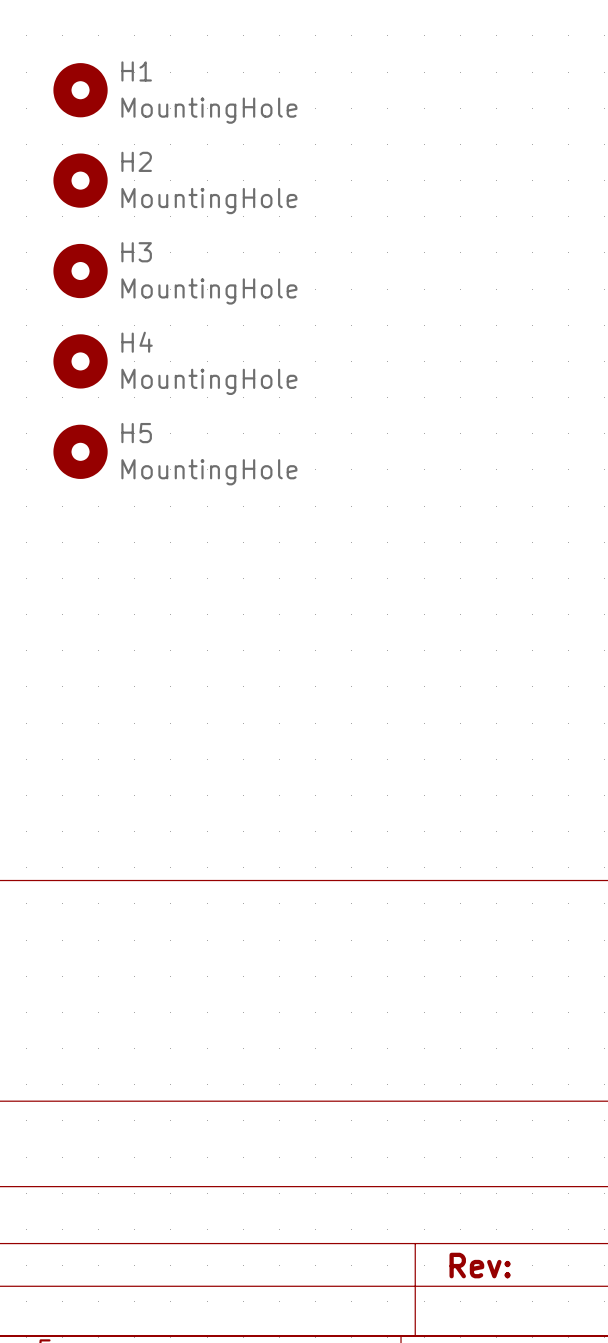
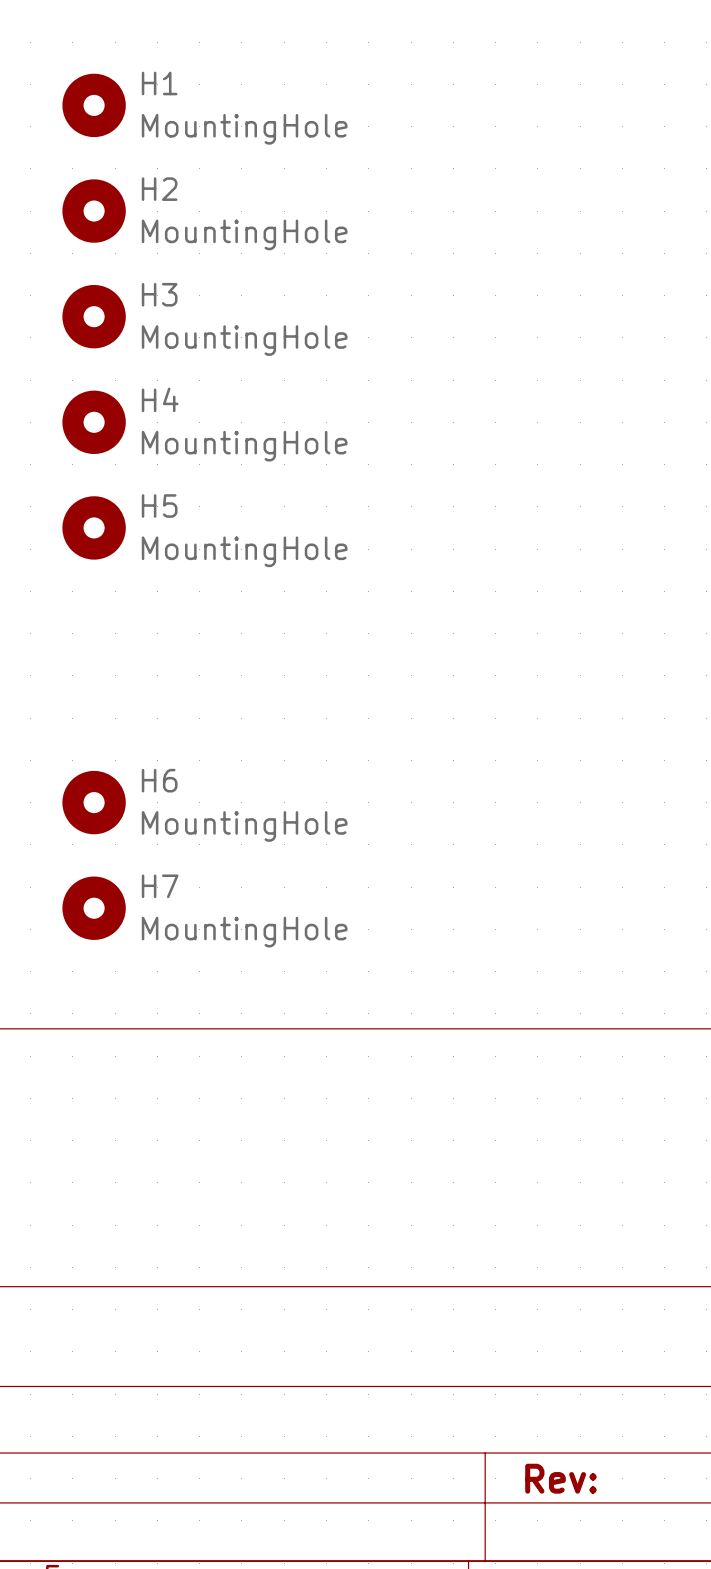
H6: none -> MountingHole (94, 802)
H7: none -> MountingHole (94, 908)

